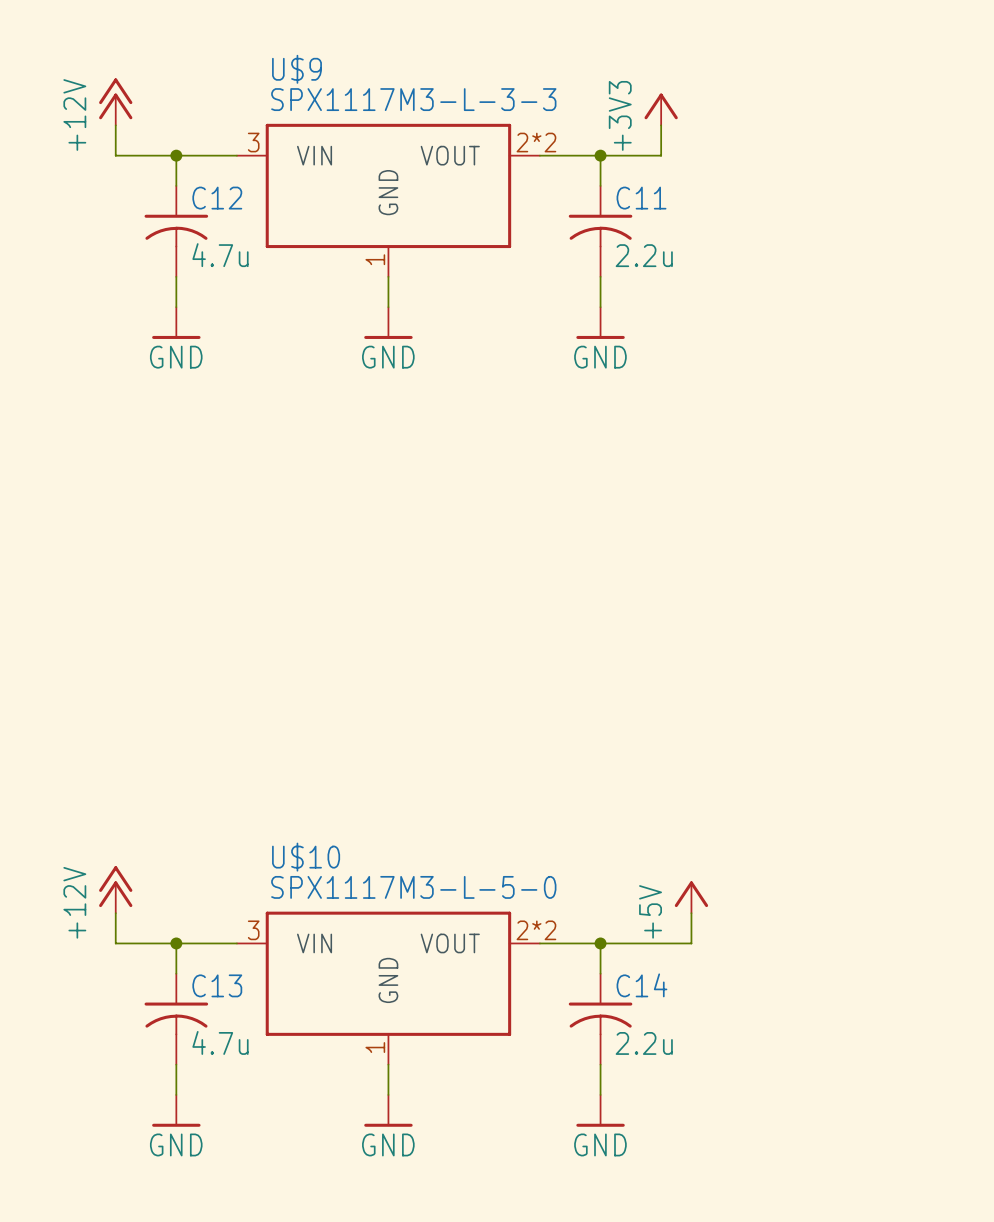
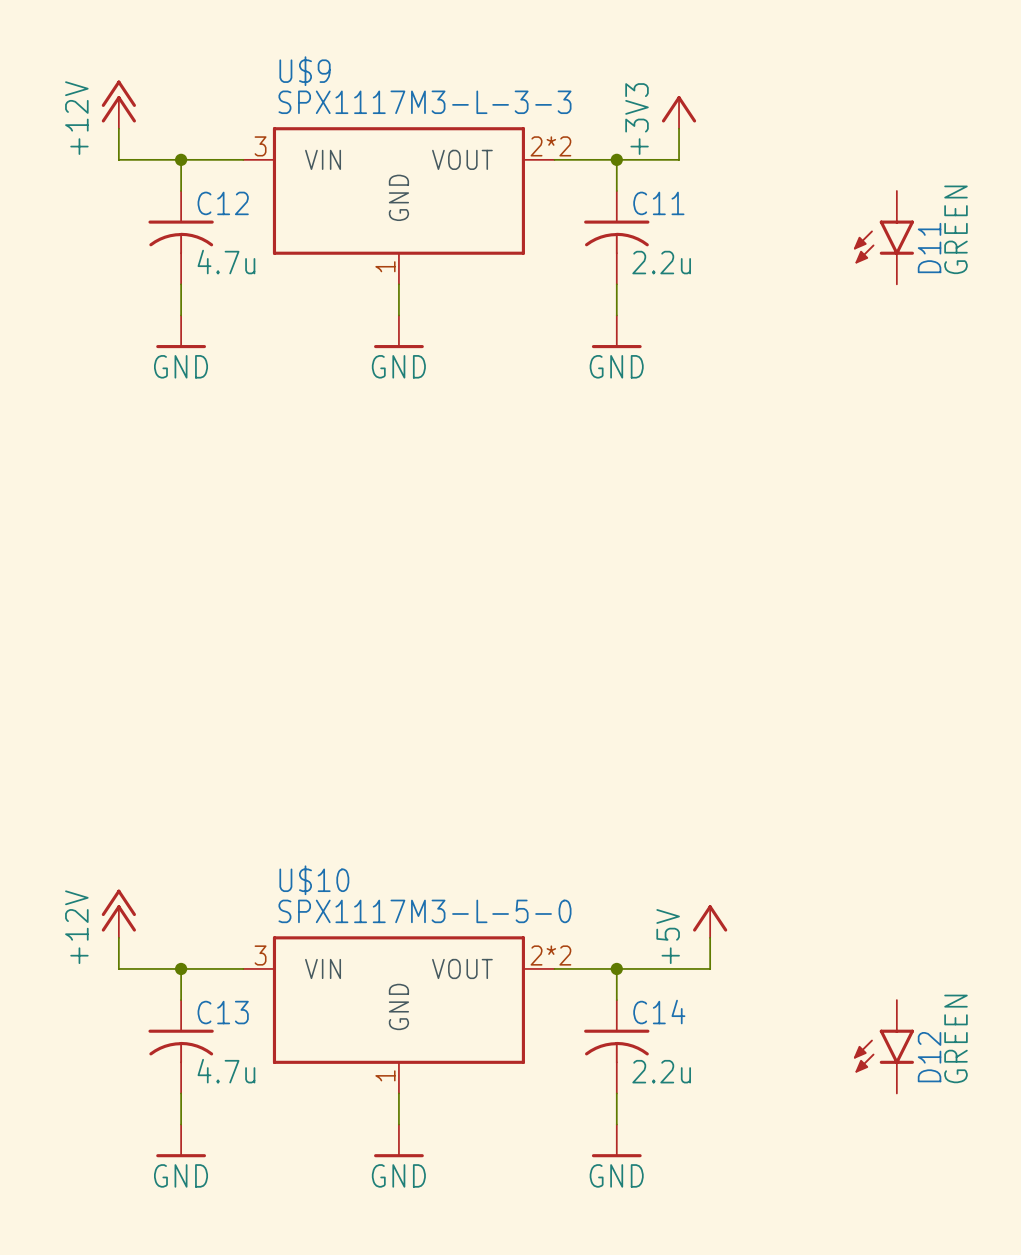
D11: none -> GREEN (883, 237)
D12: none -> GREEN (883, 1046)

